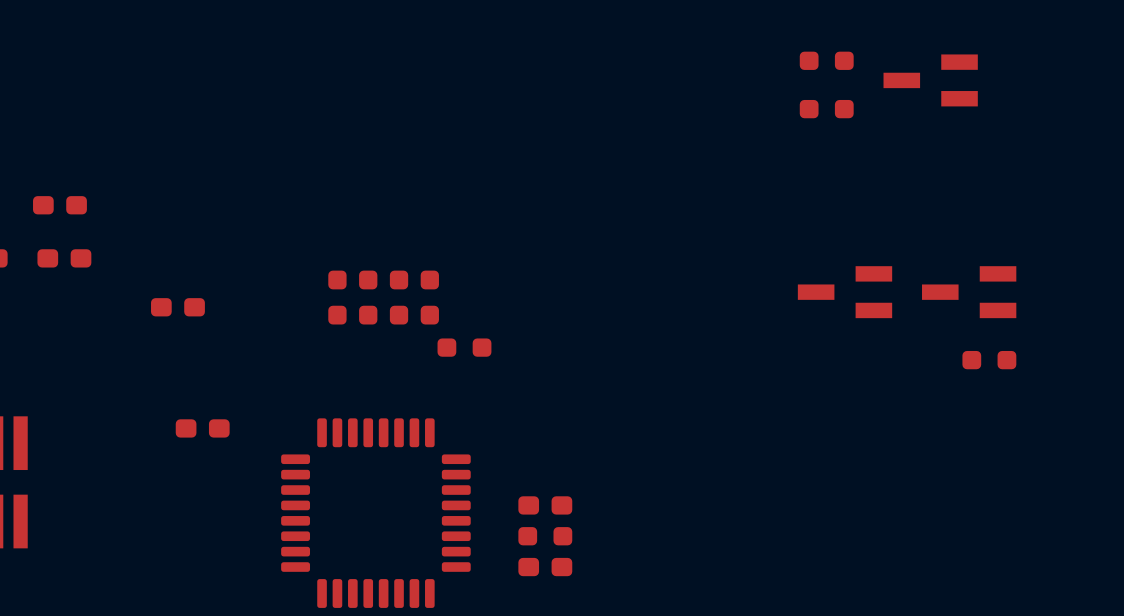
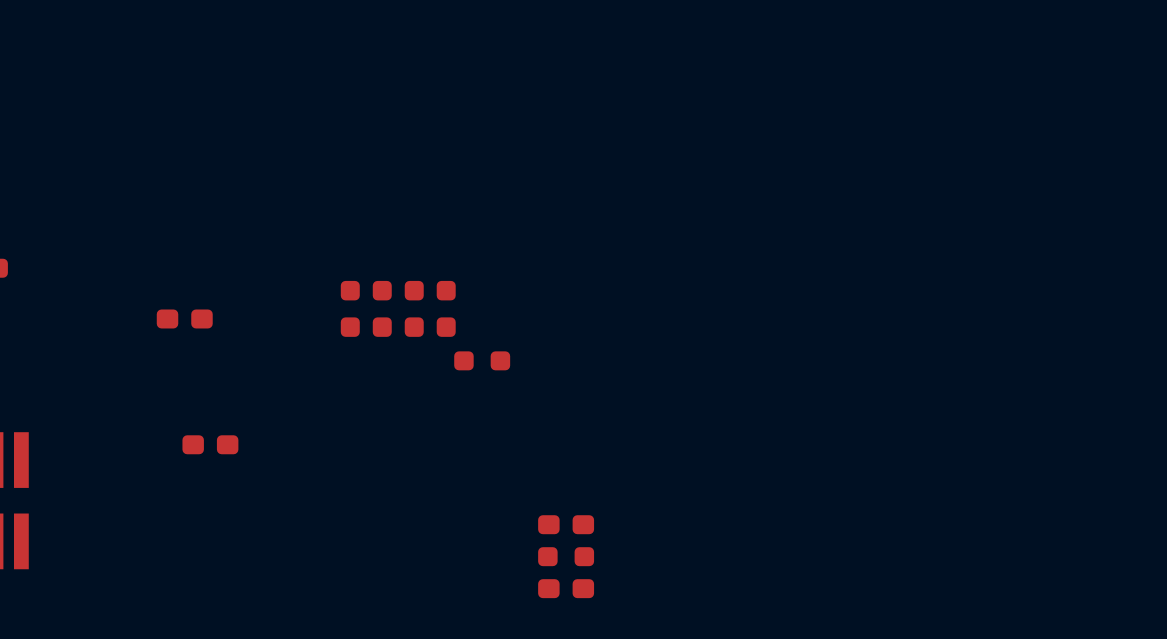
part: (826, 60) -> none
part: (930, 80) -> none
part: (826, 109) -> none
part: (59, 205) -> none
part: (64, 258) -> none
part: (845, 292) -> none
part: (969, 292) -> none
part: (989, 360) -> none
part: (375, 513) -> none

